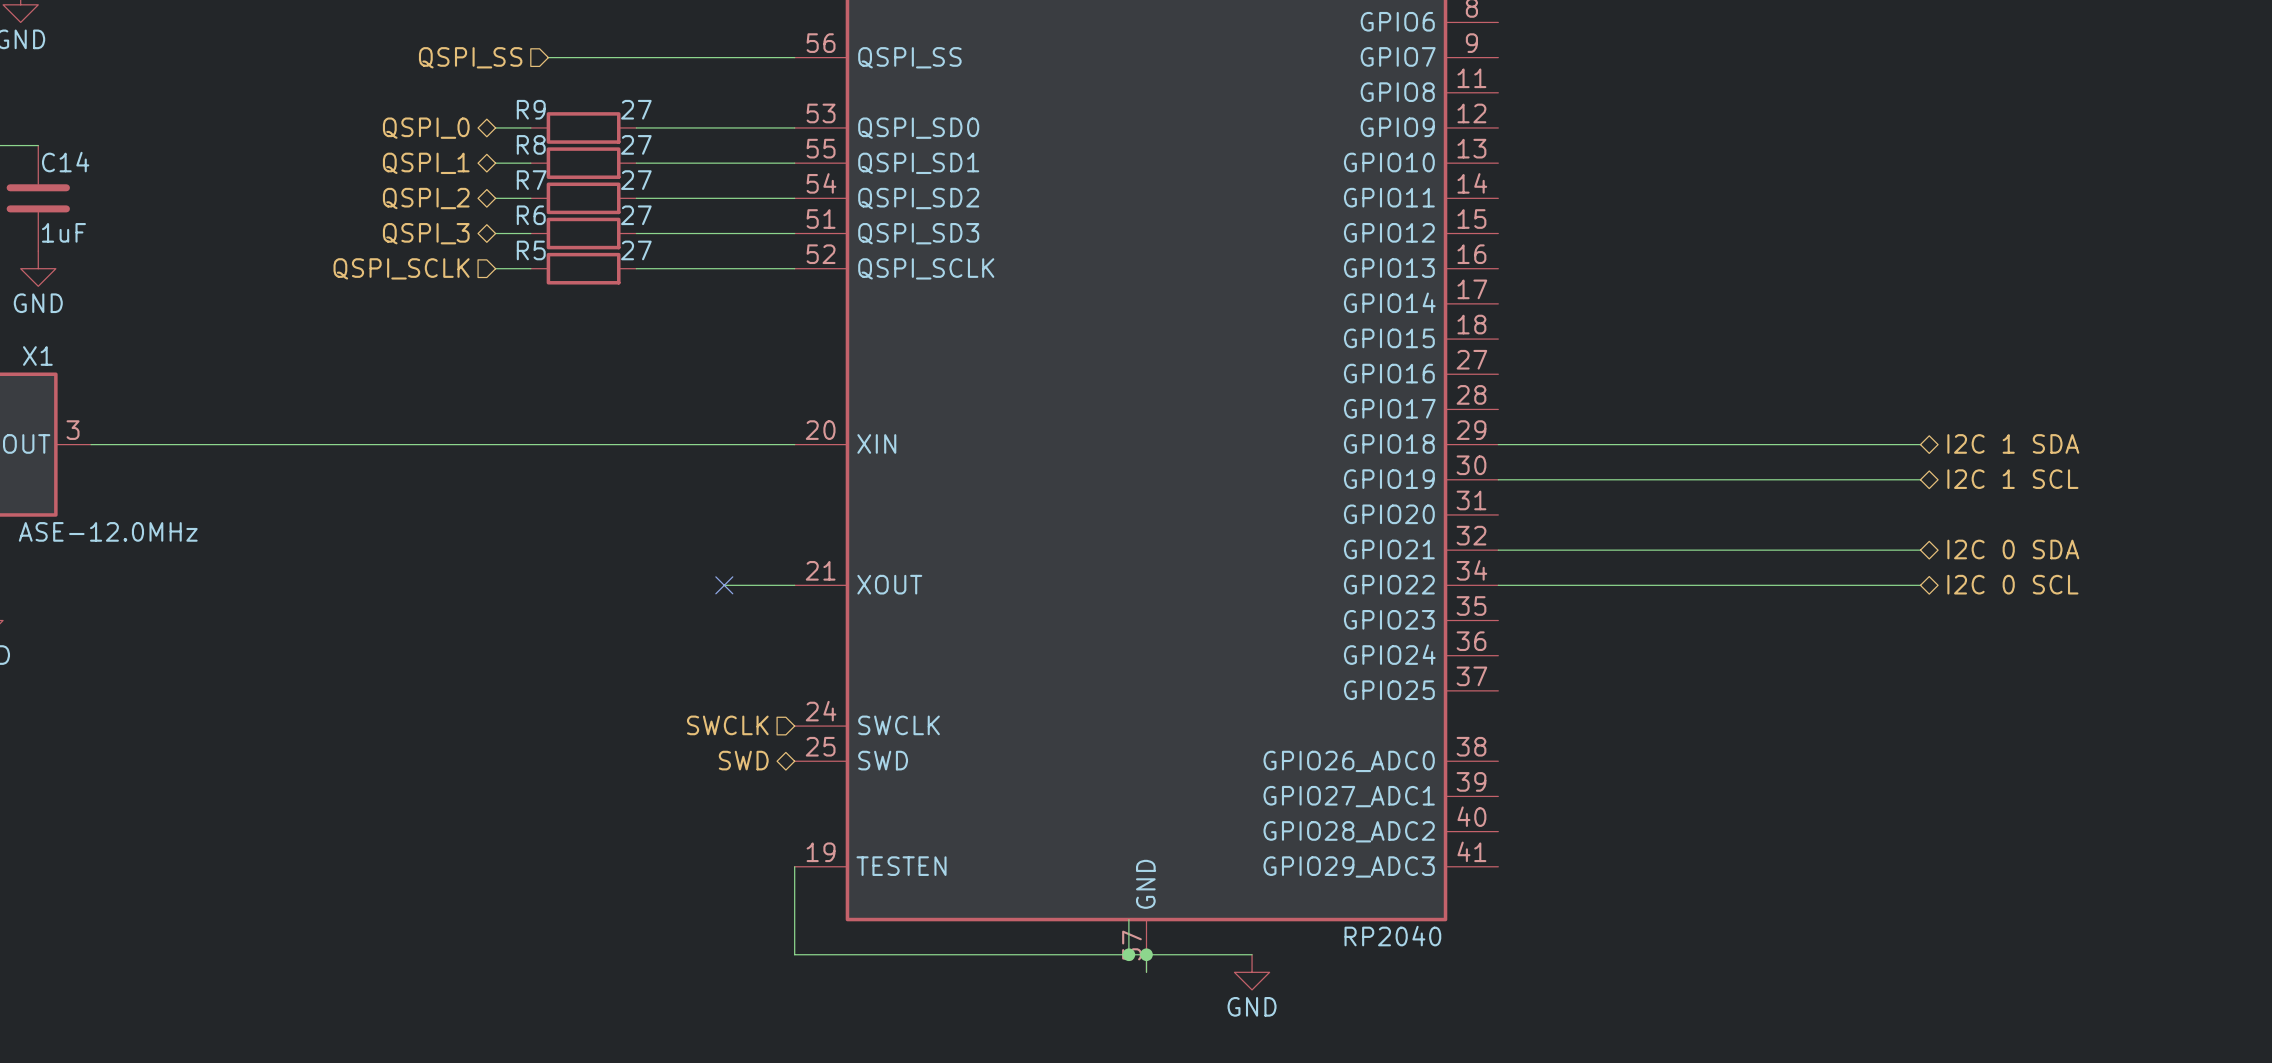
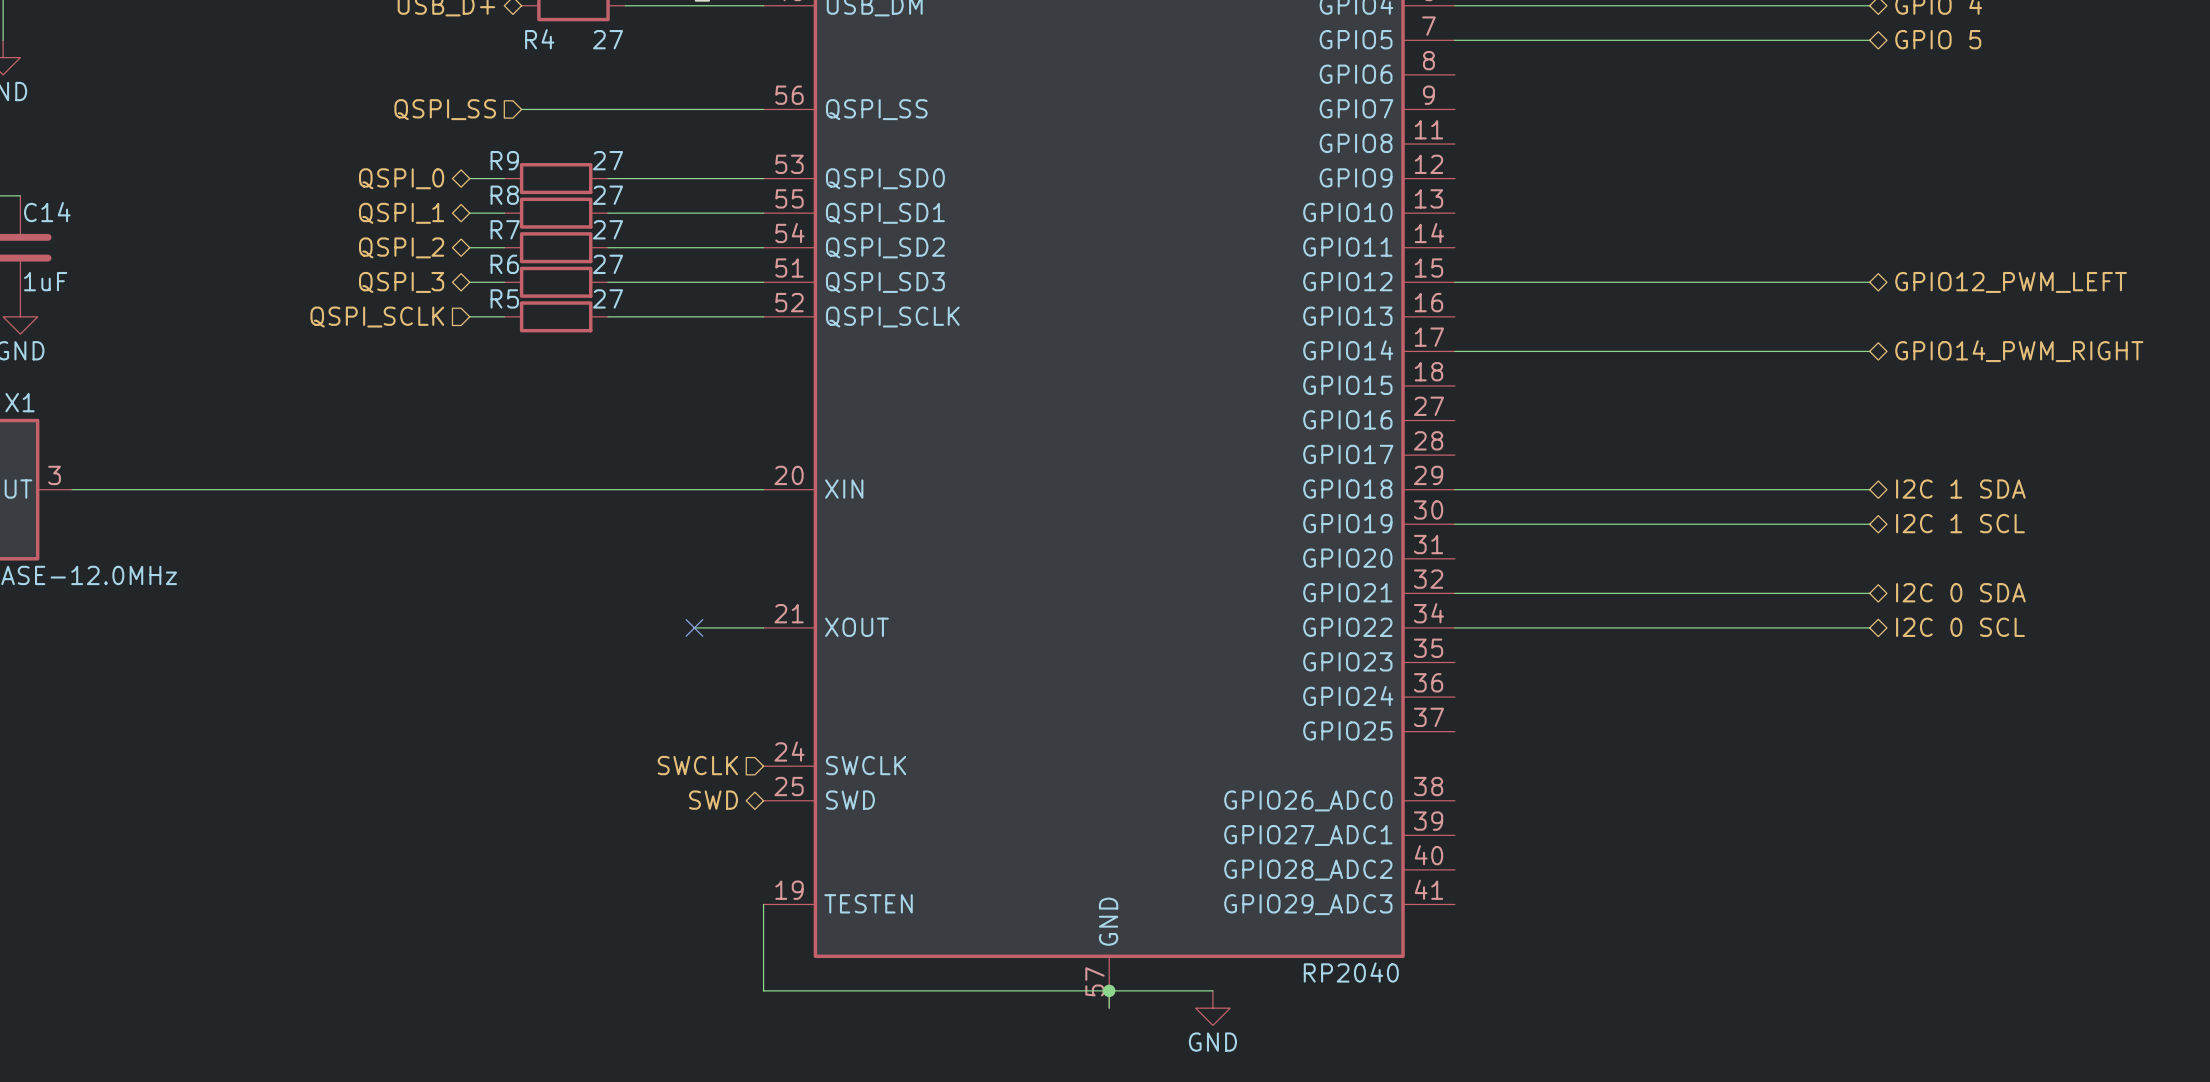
wire: none -> (1454, 282) (1869, 282)
hierarchical label: none -> GPIO12_PWM_LEFT (2011, 282)
wire: none -> (1454, 351) (1869, 351)
hierarchical label: none -> GPIO14_PWM_RIGHT (2019, 351)
wire: (1128, 919) (1128, 954) -> none
junction: (1128, 954) -> none

